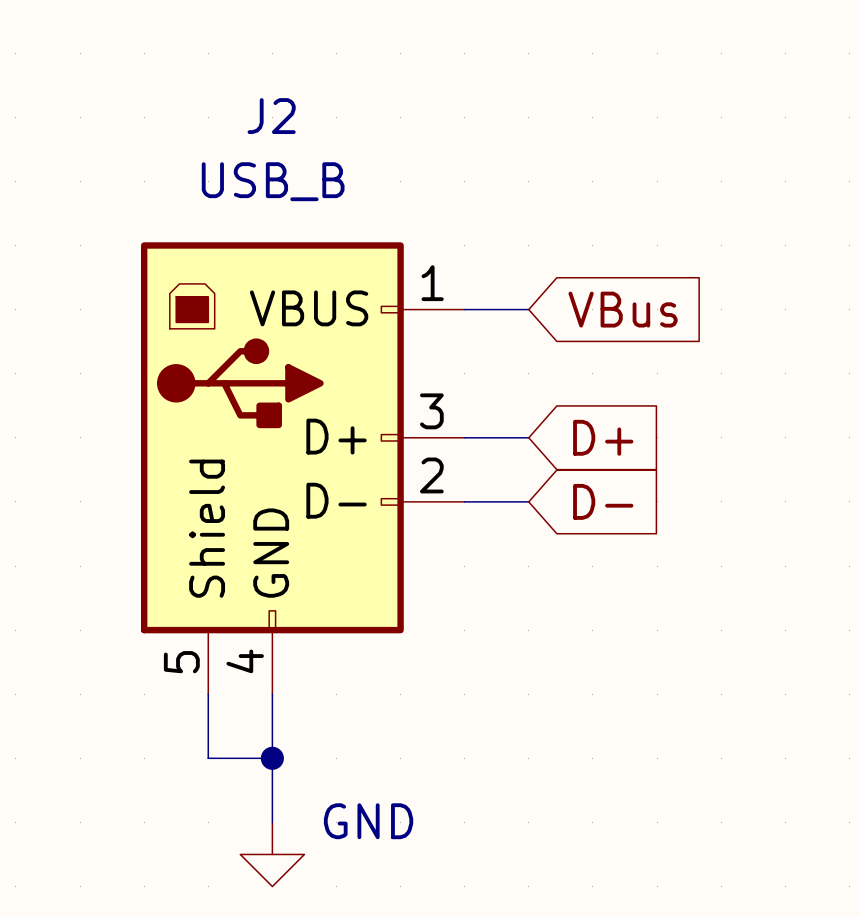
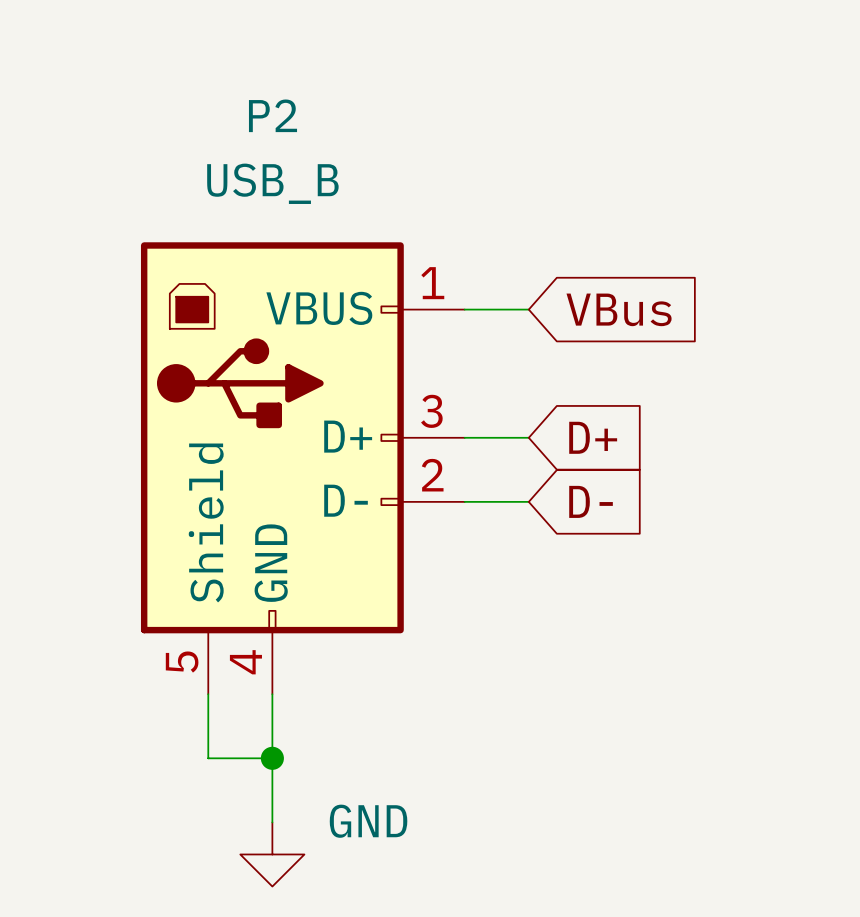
J2 name: J2 (271, 116) -> P2 (273, 115)

